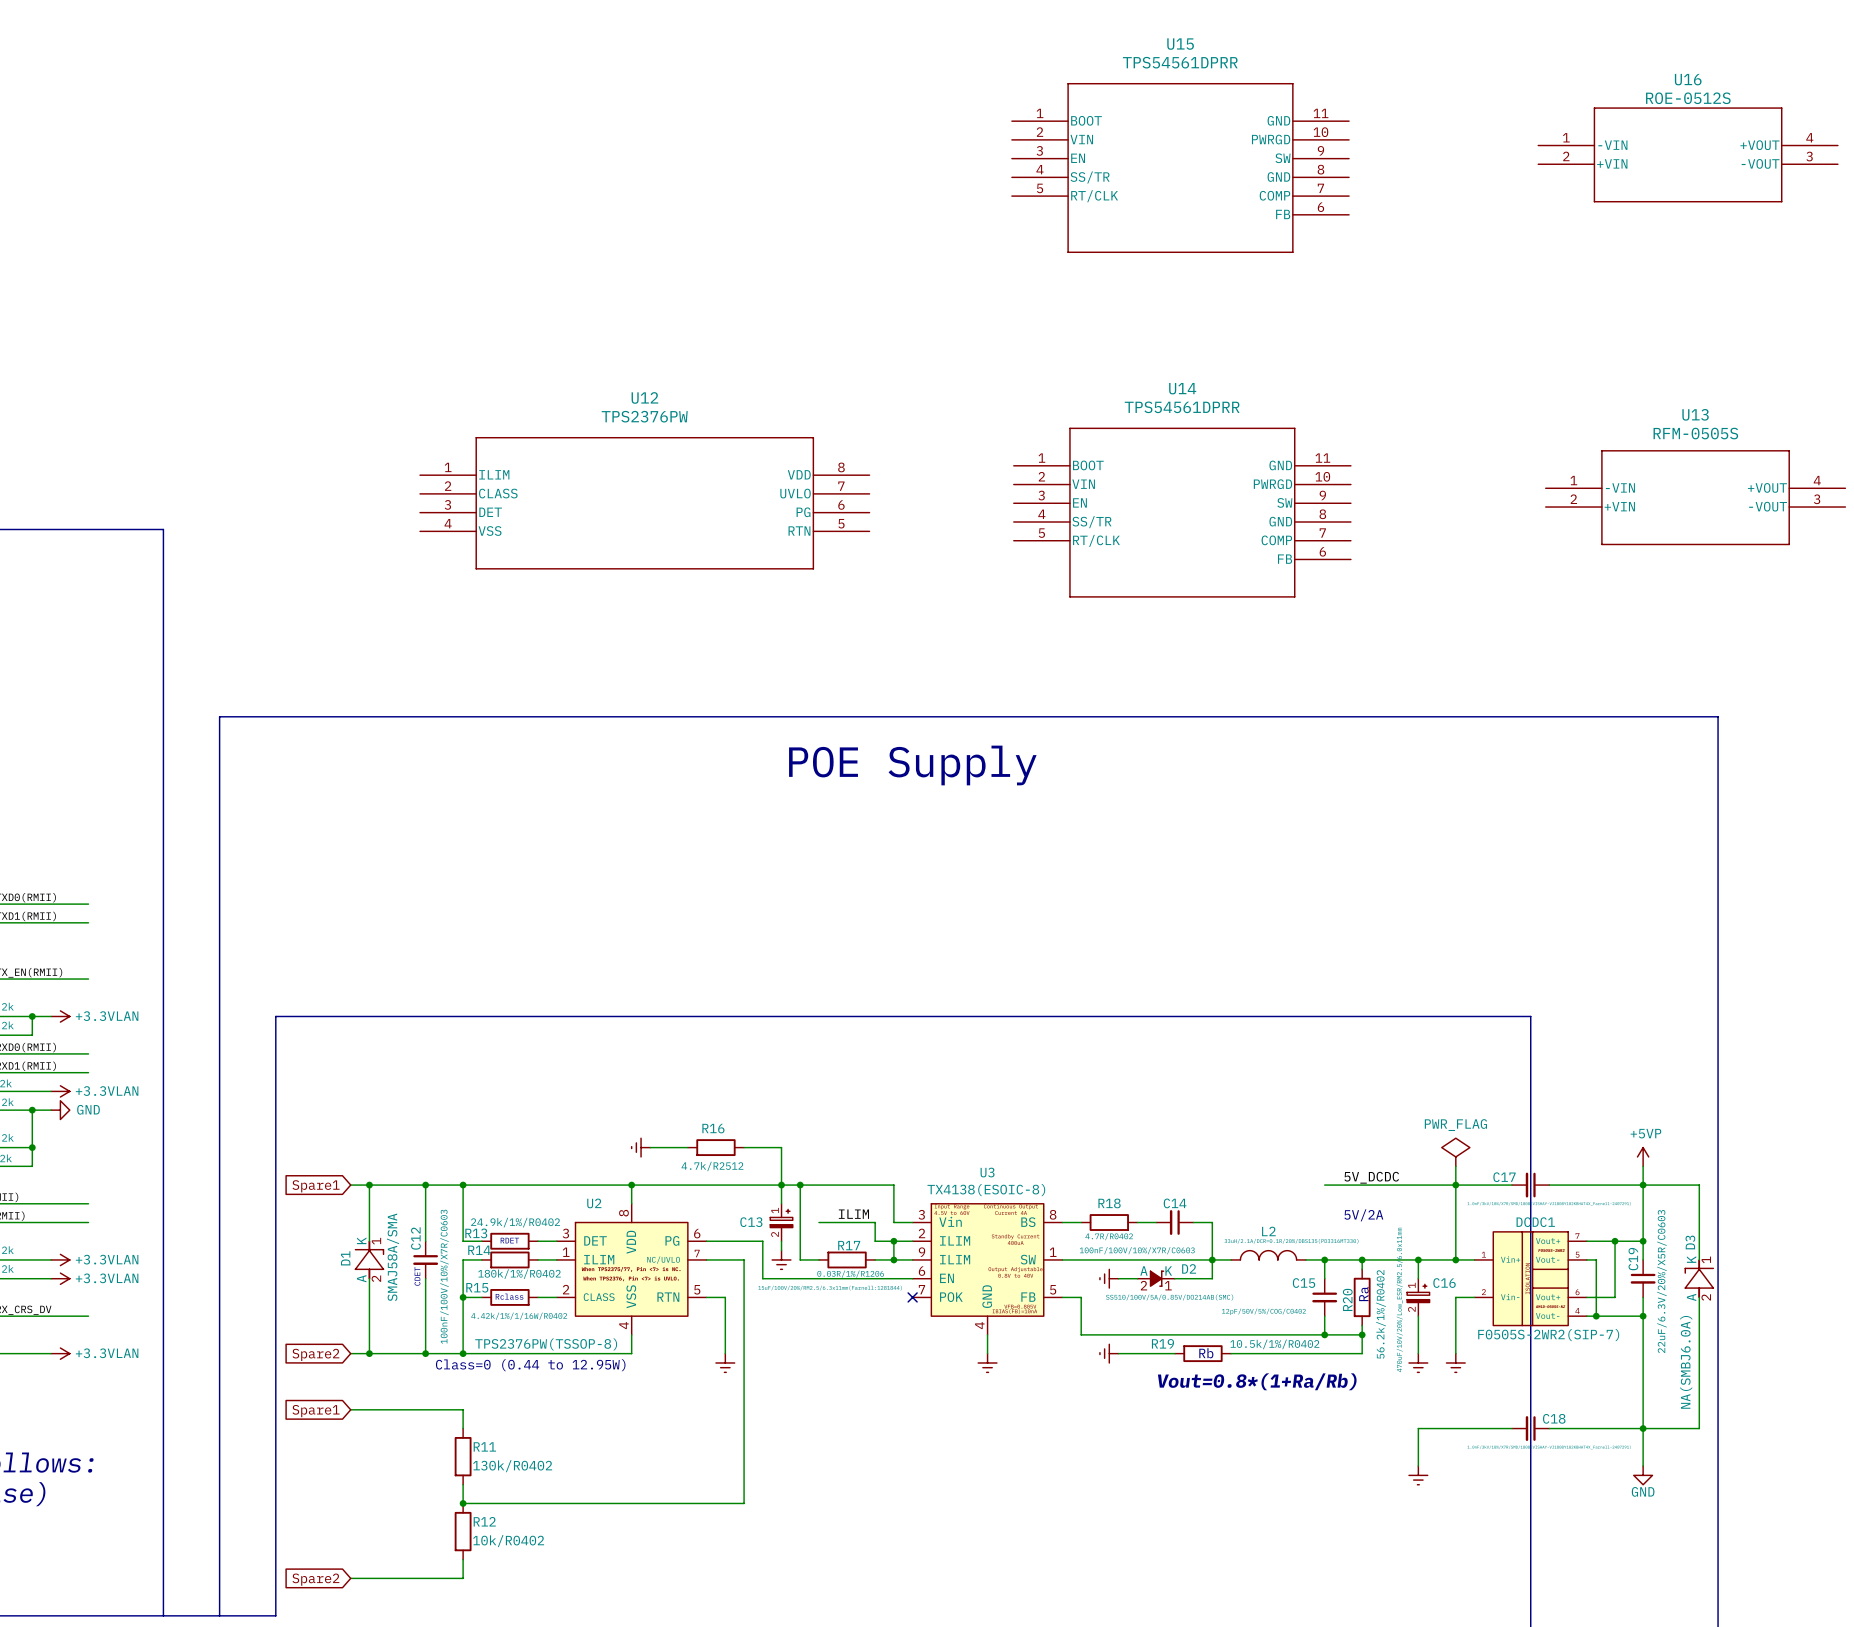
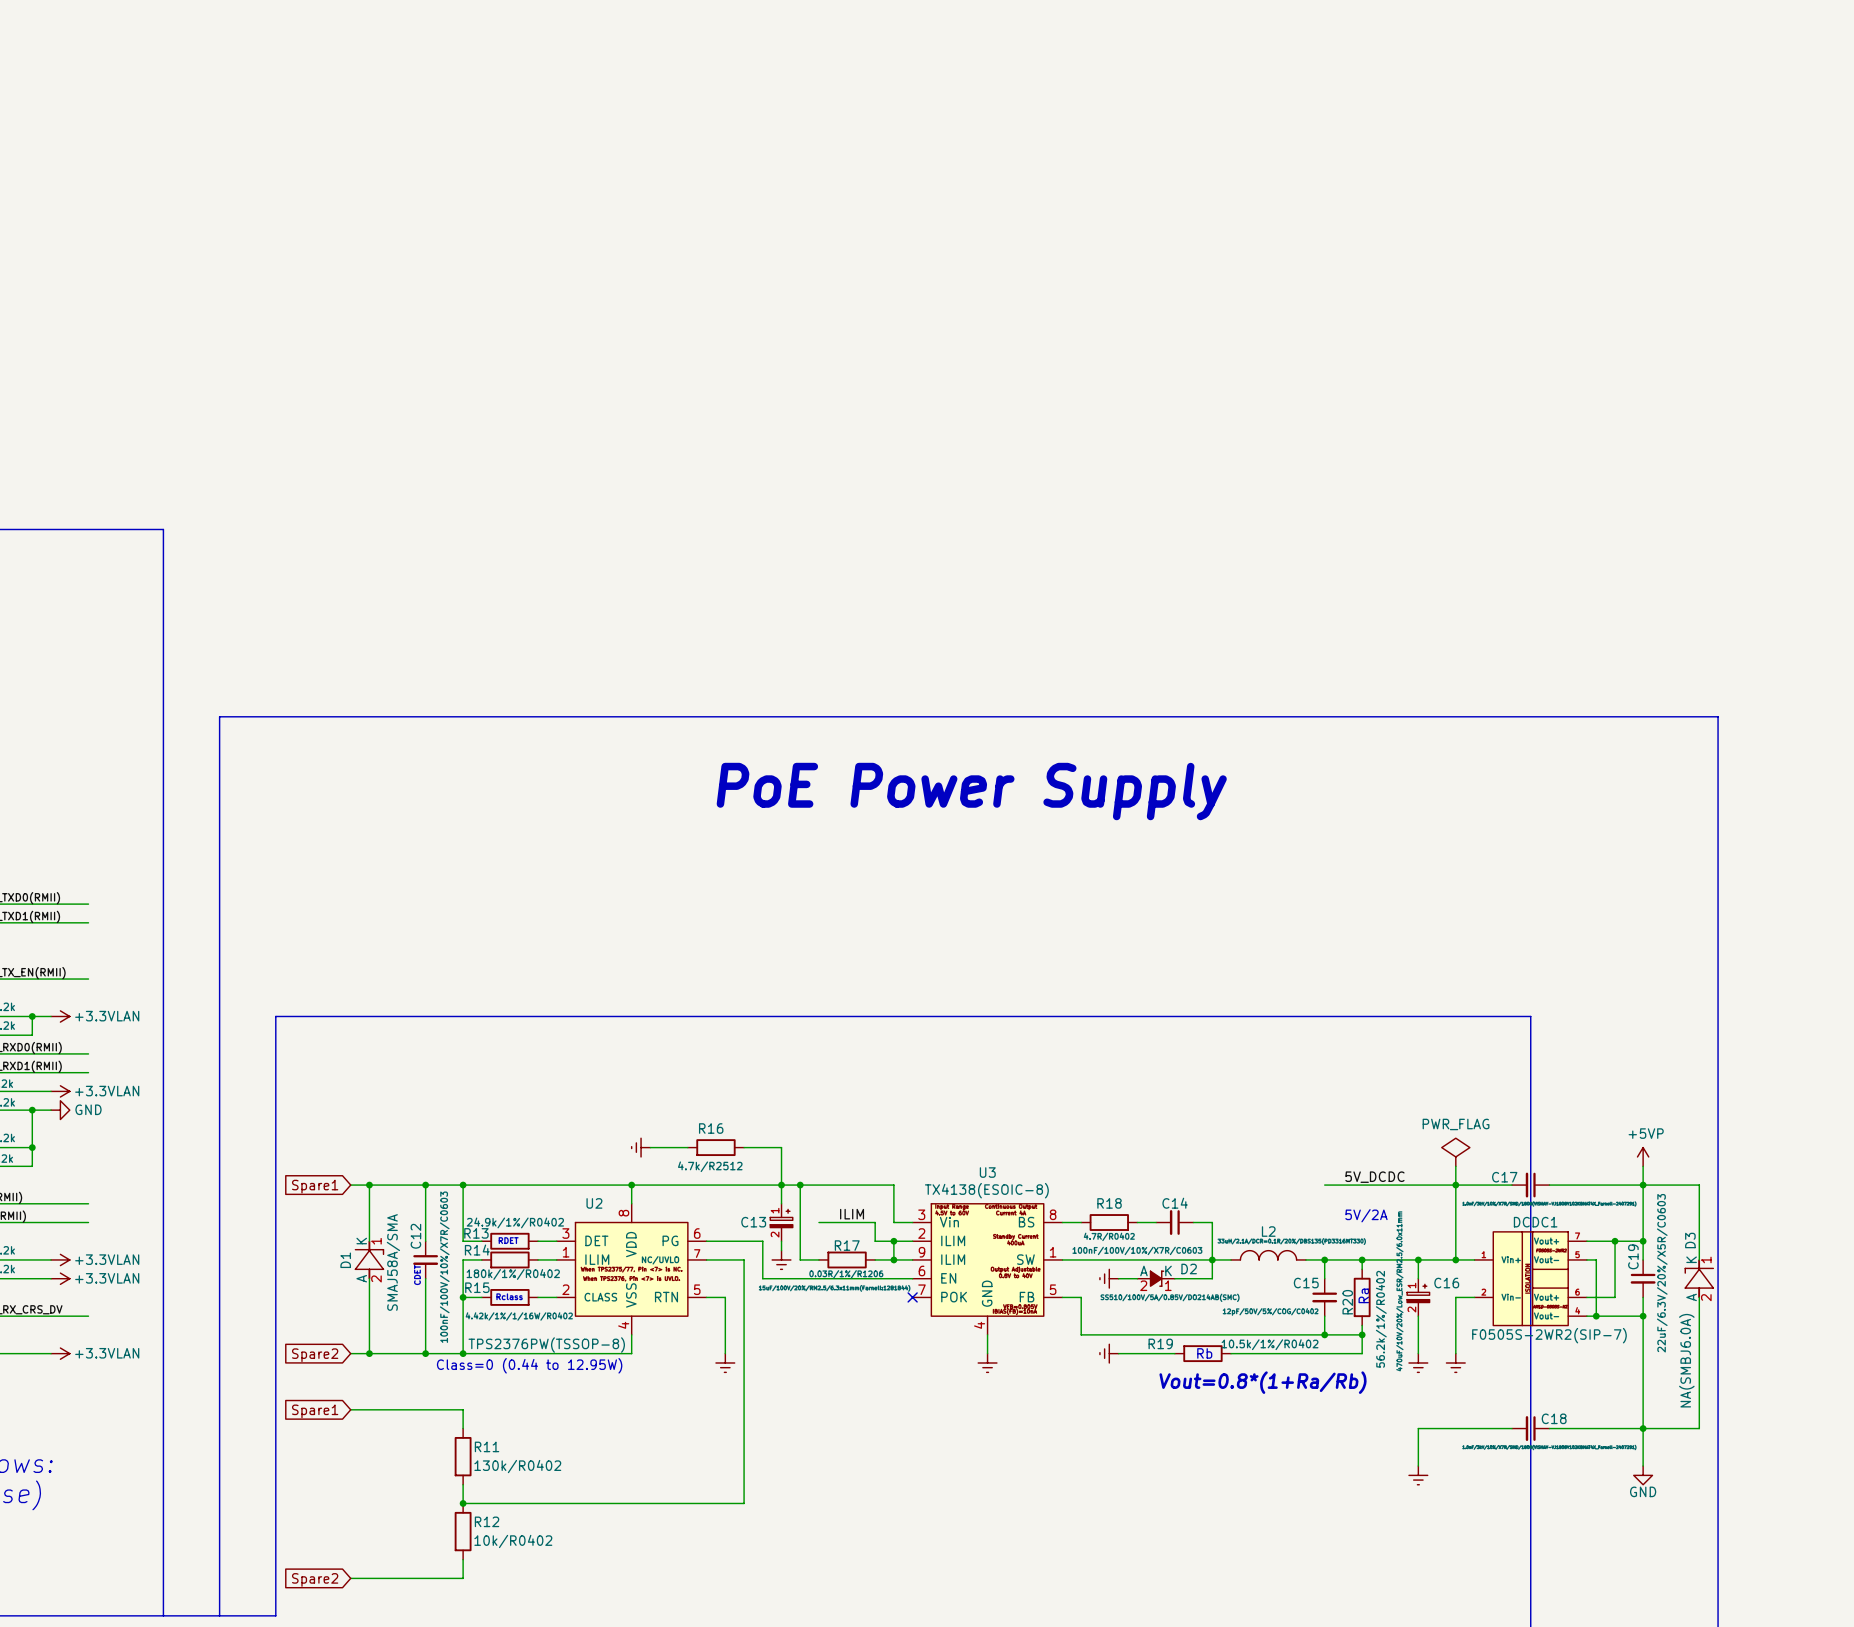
U16: ROE-0512S (1688, 154) -> none
U15: TPS54561DPRR (1180, 167) -> none
U13: RFM-0505S (1695, 497) -> none
U12: TPS2376PW (644, 503) -> none
U14: TPS54561DPRR (1182, 512) -> none
text: POE Supply (912, 765) -> PoE Power Supply (971, 791)

